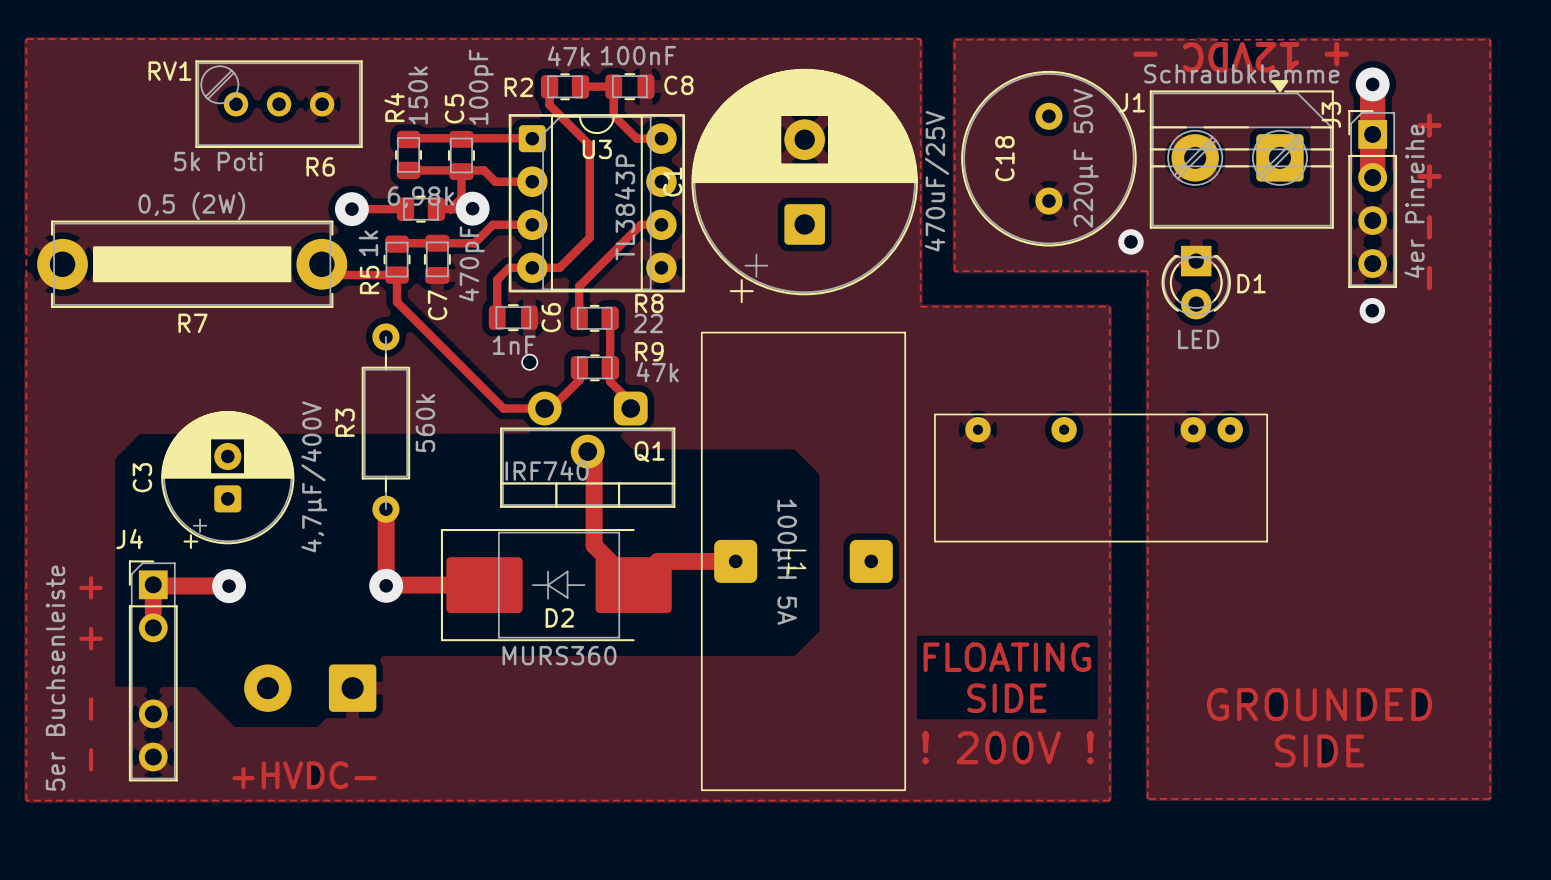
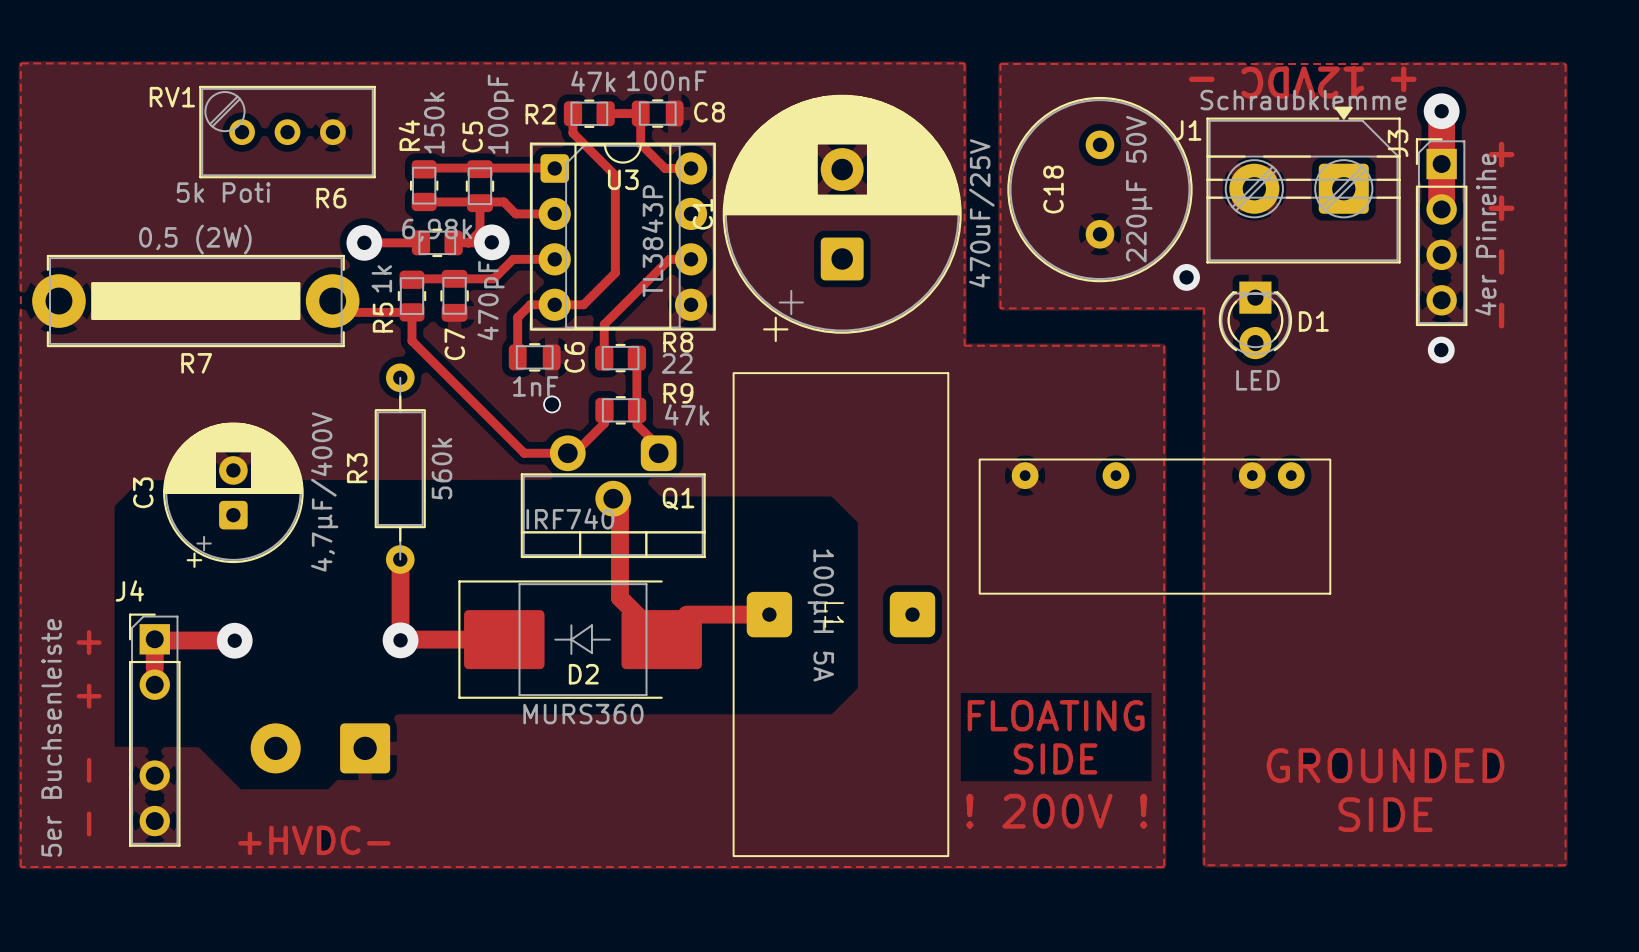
C3 position: (227, 479) -> (233, 495)

